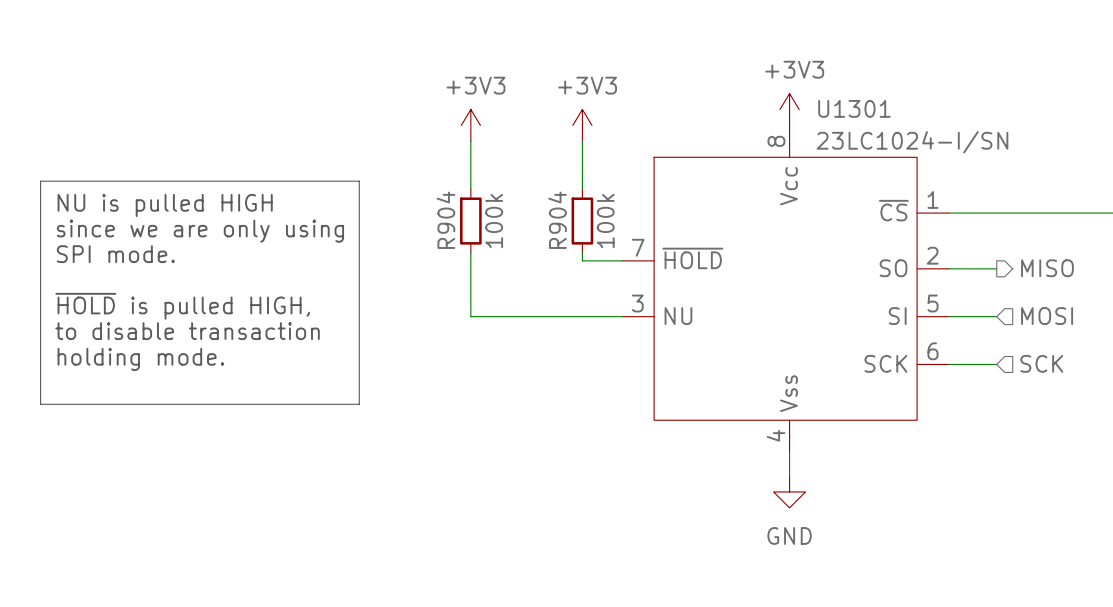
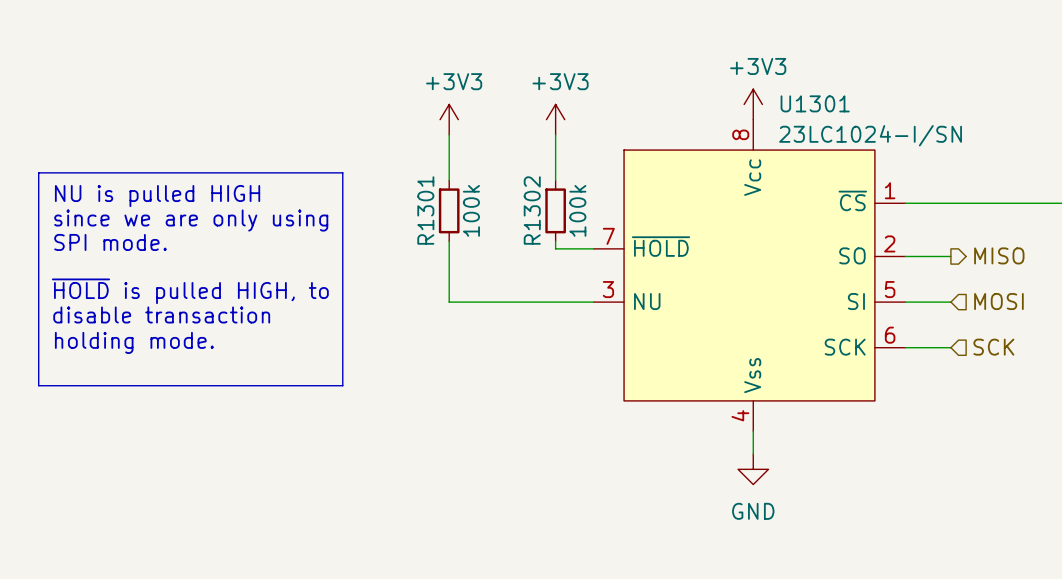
R904 name: R904 (445, 220) -> R1301 (425, 210)
R904 name: R904 (557, 220) -> R1302 (532, 210)
text: ~{HOLD} is pulled HIGH, (182, 306) -> ~{HOLD} is pulled HIGH, to (190, 291)
text: to disable transaction (187, 331) -> disable transaction (161, 314)

